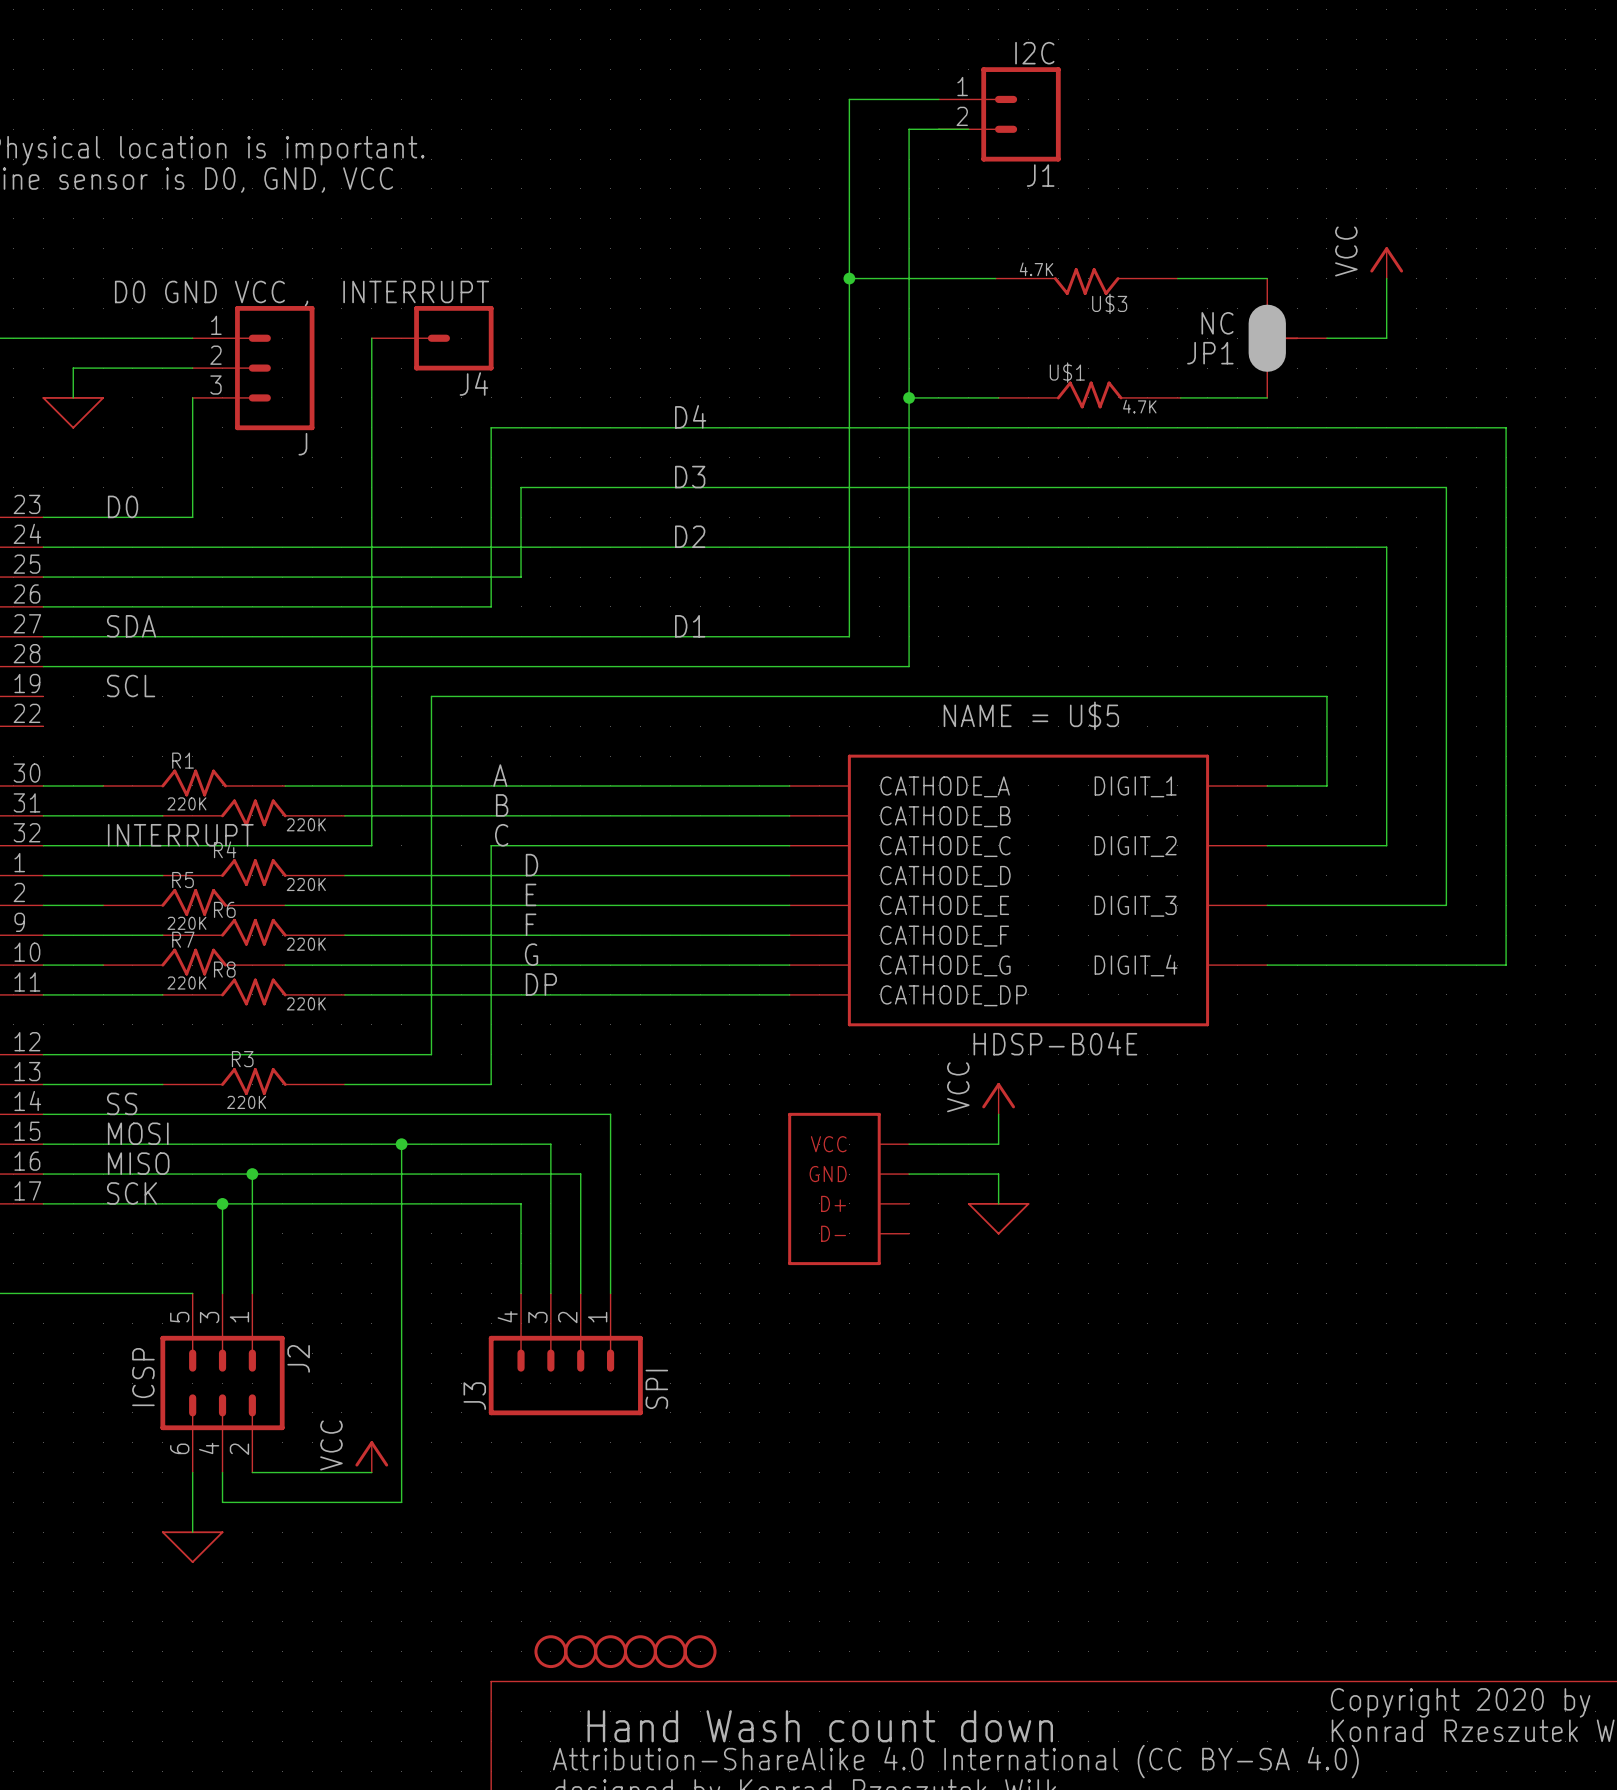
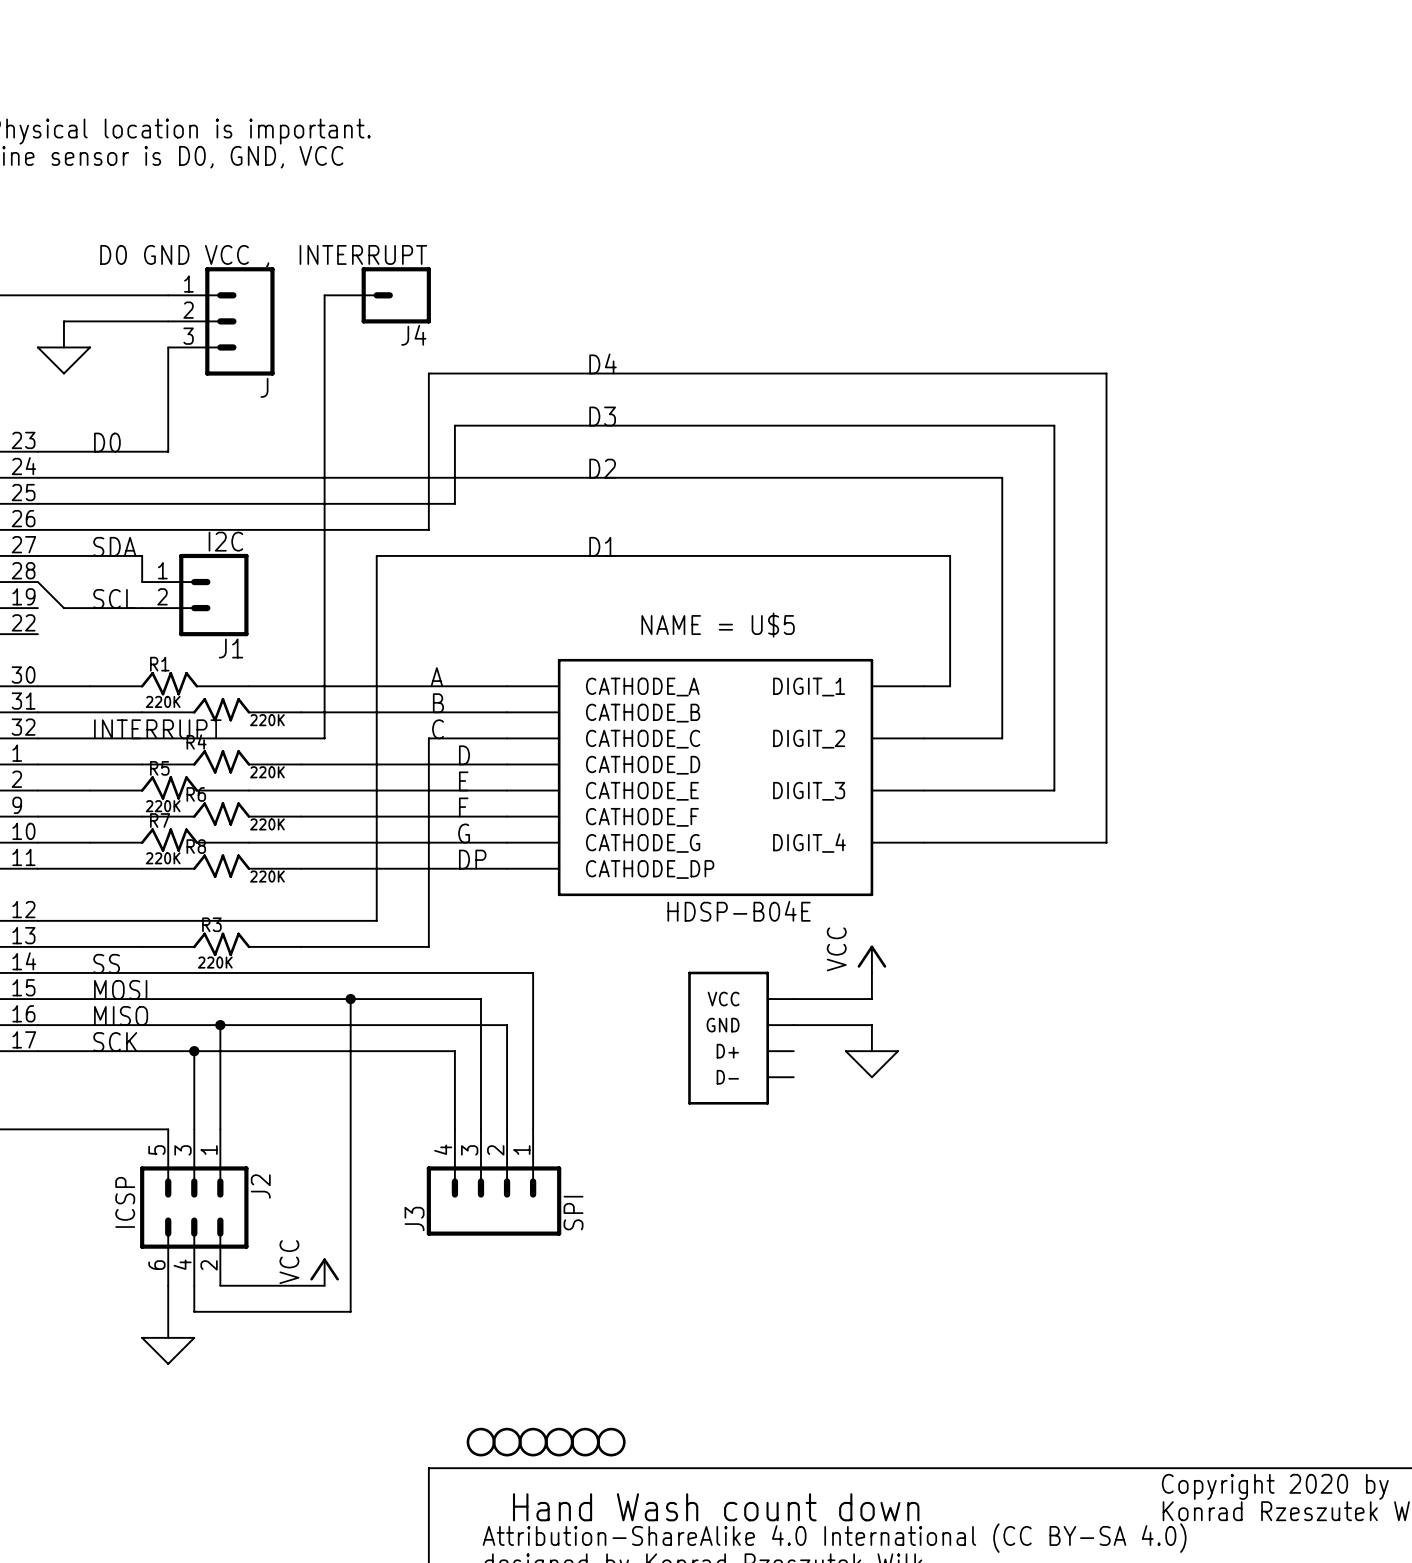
wire: (938, 99) (849, 99) (849, 636) -> (924, 686) (950, 686) (950, 555) (741, 555)
J1 position: (999, 114) -> (195, 595)
wire: (968, 129) (909, 129) (909, 666) (43, 666) -> (142, 608) (63, 608) (37, 582)
power symbol: VCC (1386, 262) -> none
wire: (849, 278) (995, 278) -> none
junction: (849, 278) -> none
wire: (1177, 278) (1267, 278) -> none
wire: (1386, 278) (1386, 338) (1326, 338) -> none
U$3: 4.7K (1086, 281) -> none
JP1: NC (1287, 338) -> none
U$1: 4.7K (1089, 394) -> none
wire: (909, 397) (998, 397) -> none
junction: (909, 397) -> none
wire: (1180, 397) (1267, 397) -> none
wire: (1267, 427) (1506, 427) (1506, 965) (1267, 965) -> (1106, 373) (1106, 842) (924, 842)
wire: (1207, 487) (1446, 487) (1446, 905) (1267, 905) -> (1054, 425) (1054, 790) (924, 790)
wire: (1147, 547) (1386, 547) (1386, 845) (1267, 845) -> (1002, 477) (1002, 738) (924, 738)
wire: (162, 636) (431, 636) -> (142, 555) (142, 582)
wire: (431, 696) (1326, 696) (1326, 785) (1267, 785) -> (376, 608) (376, 555)
wire: (580, 785) (789, 785) -> none
wire: (580, 815) (789, 815) -> none
wire: (580, 845) (789, 845) -> none
wire: (580, 875) (789, 875) -> none
NAME = U$5 position: (1028, 890) -> (715, 777)
wire: (580, 905) (789, 905) -> none
wire: (580, 935) (789, 935) -> none
wire: (580, 965) (789, 965) -> none
wire: (580, 994) (789, 994) -> none

